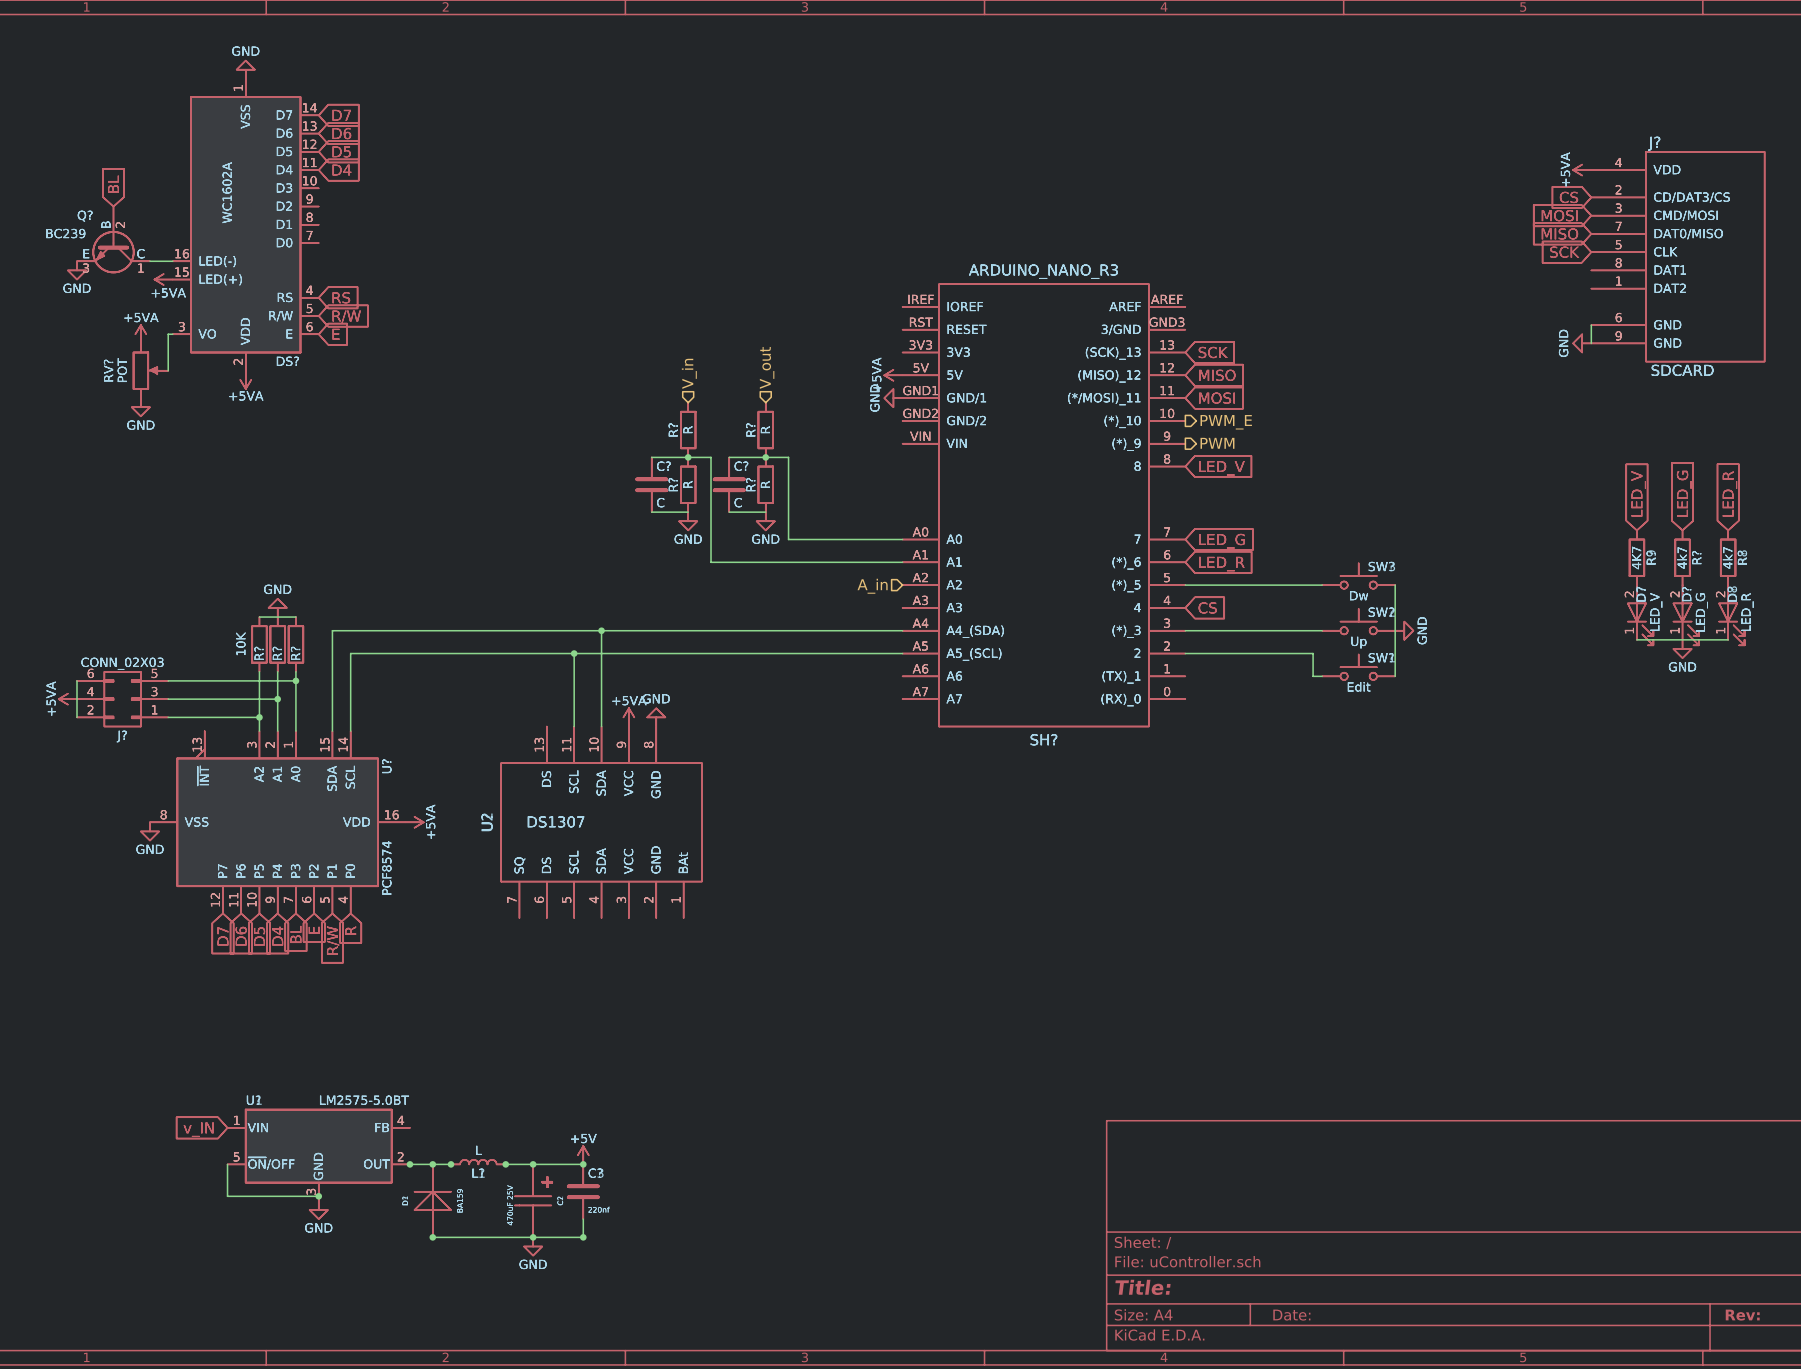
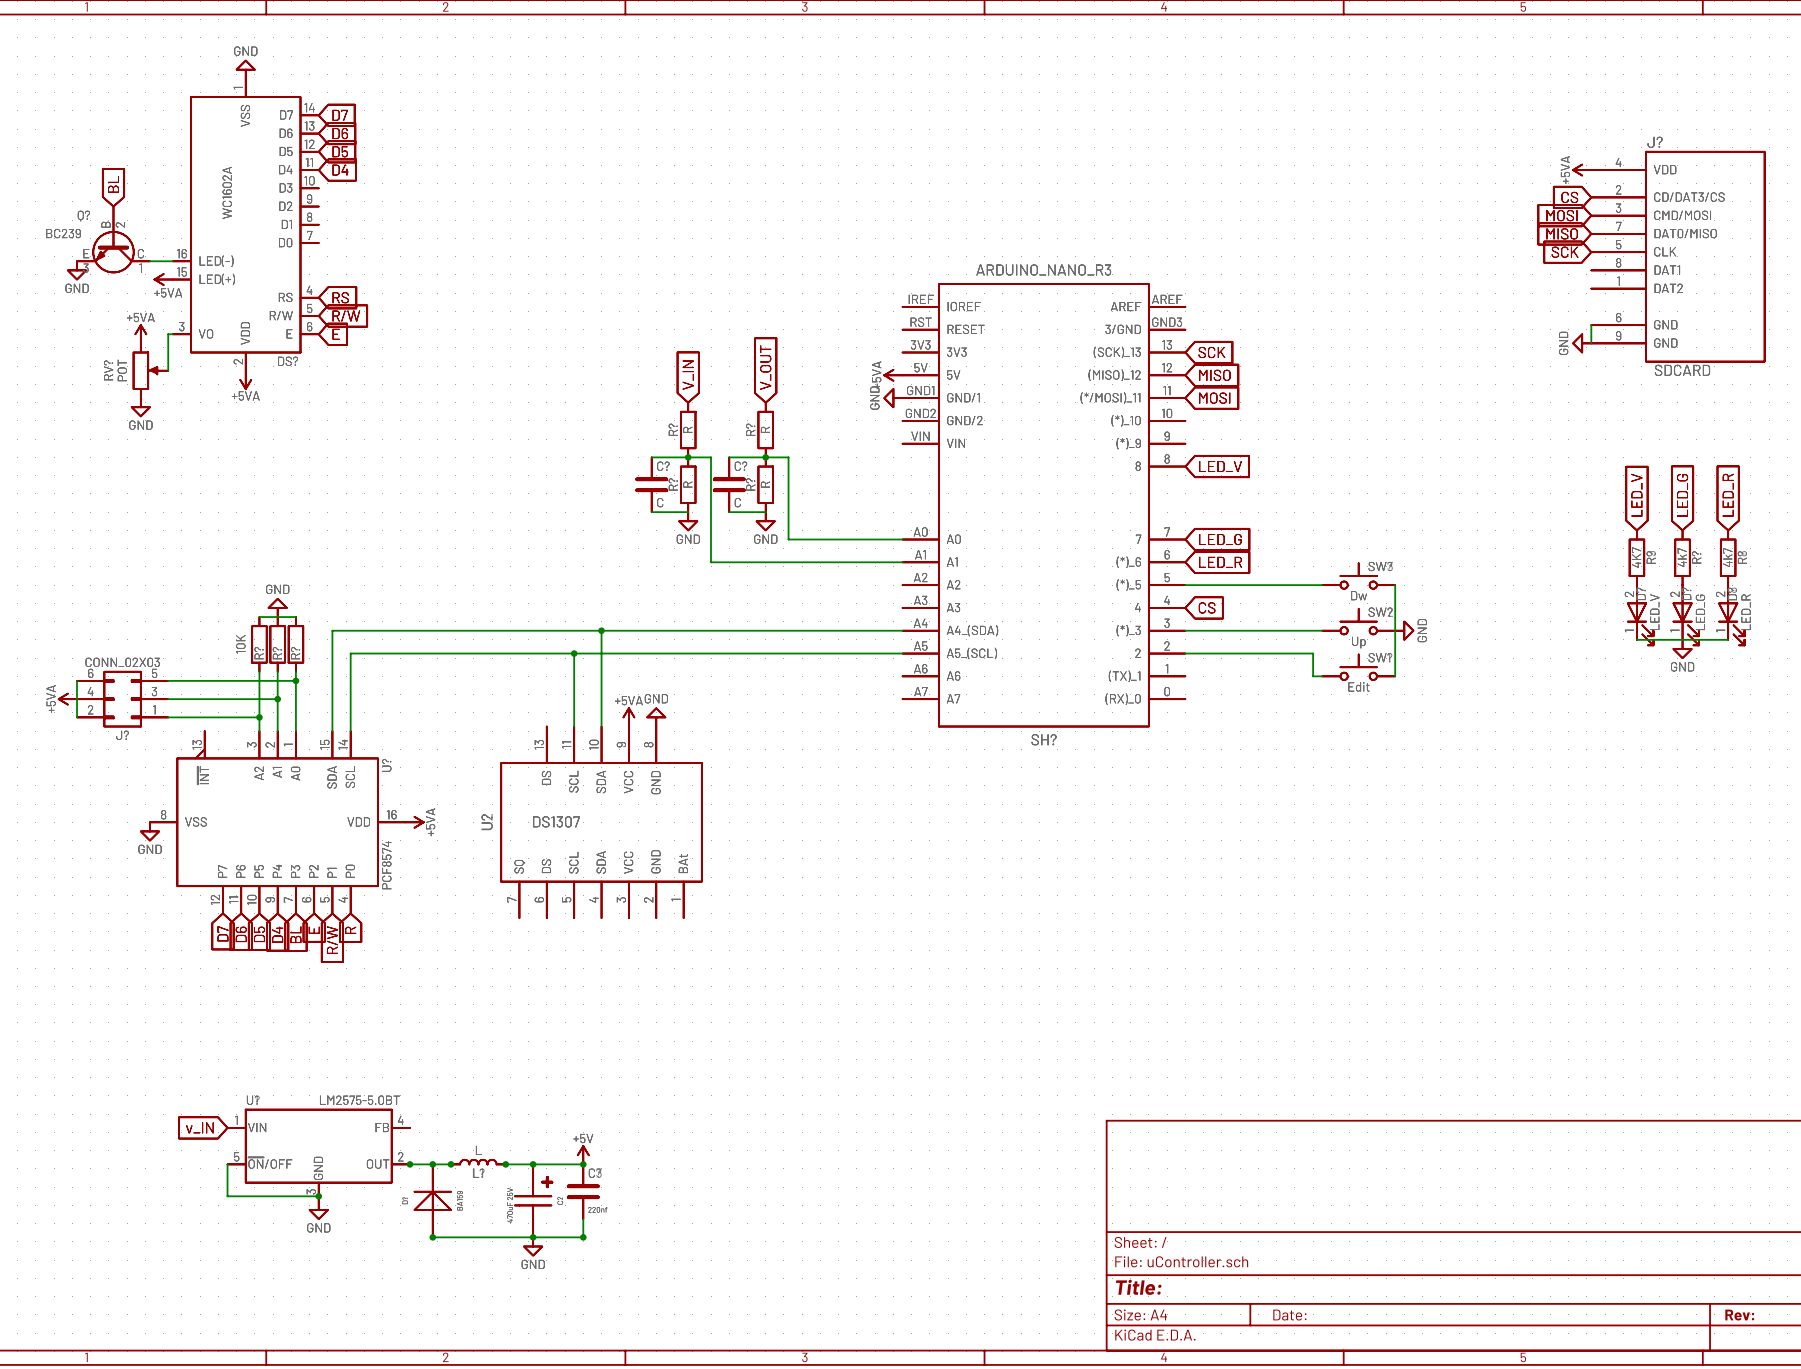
global label: none -> V_OUT (765, 367)
hierarchical label: V_out (767, 367) -> none
hierarchical label: V_in (689, 373) -> none
global label: none -> V_IN (688, 375)
hierarchical label: PWM_E (1226, 422) -> none
hierarchical label: PWM (1217, 443) -> none
hierarchical label: A_in (872, 586) -> none

